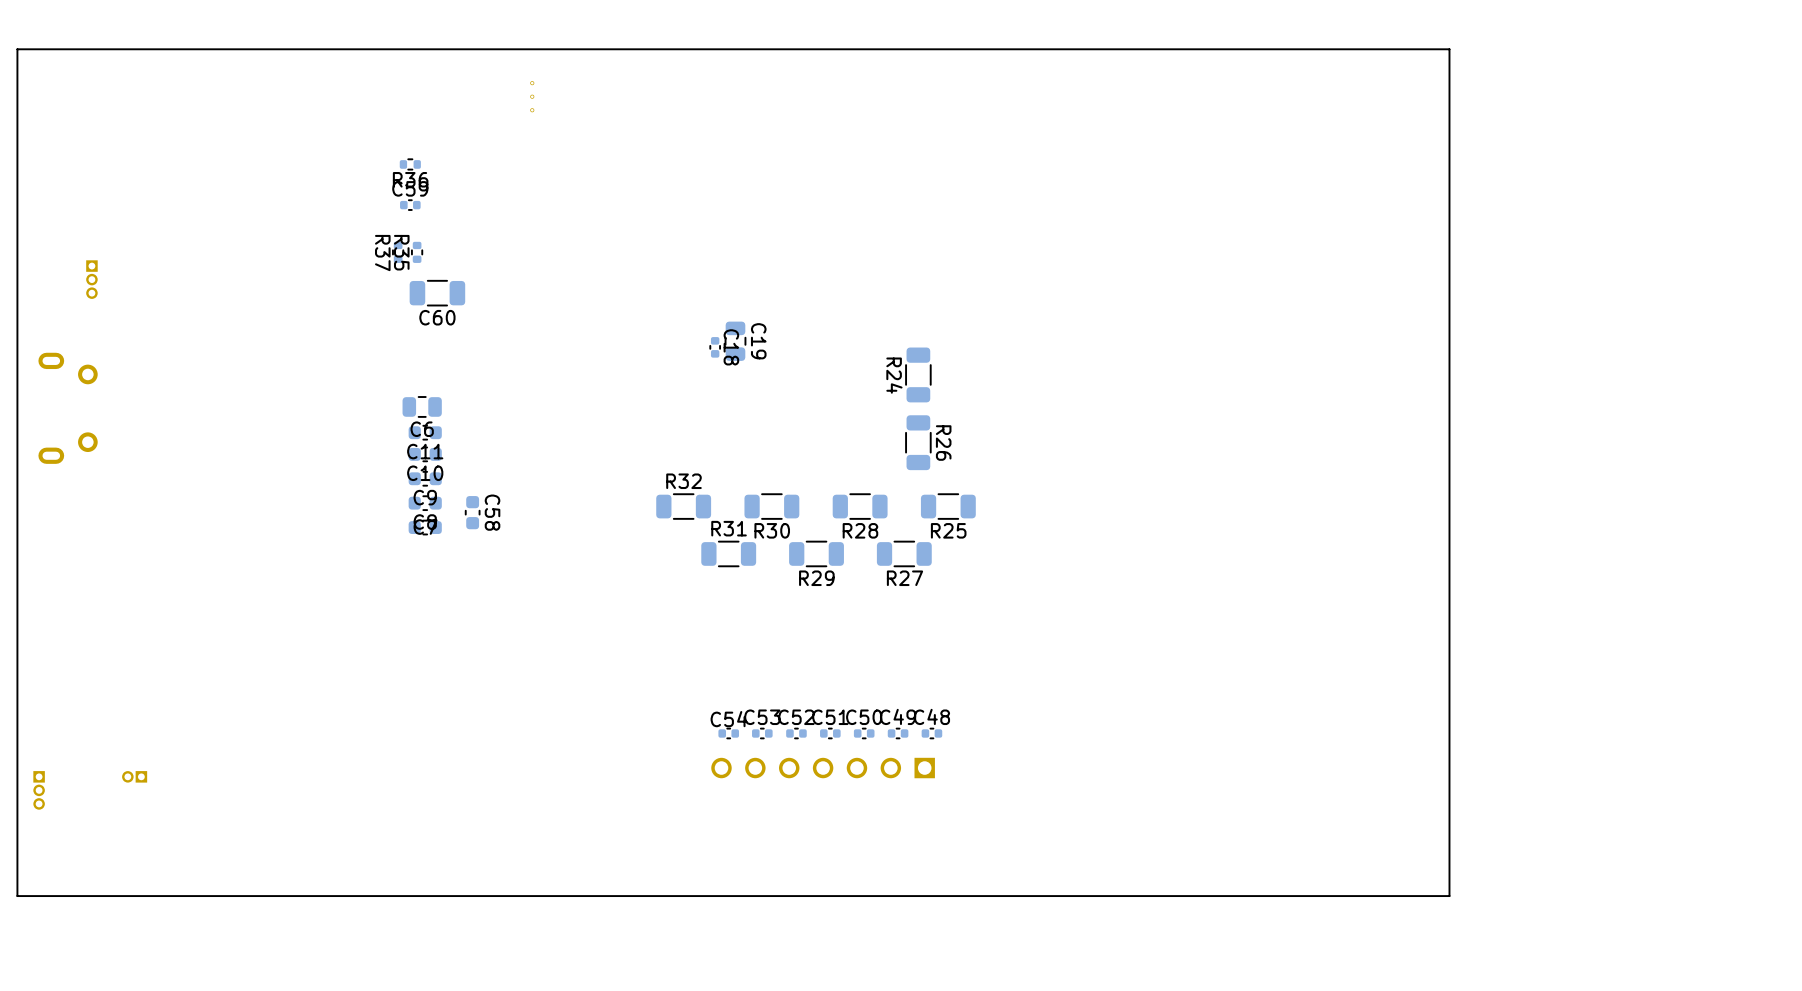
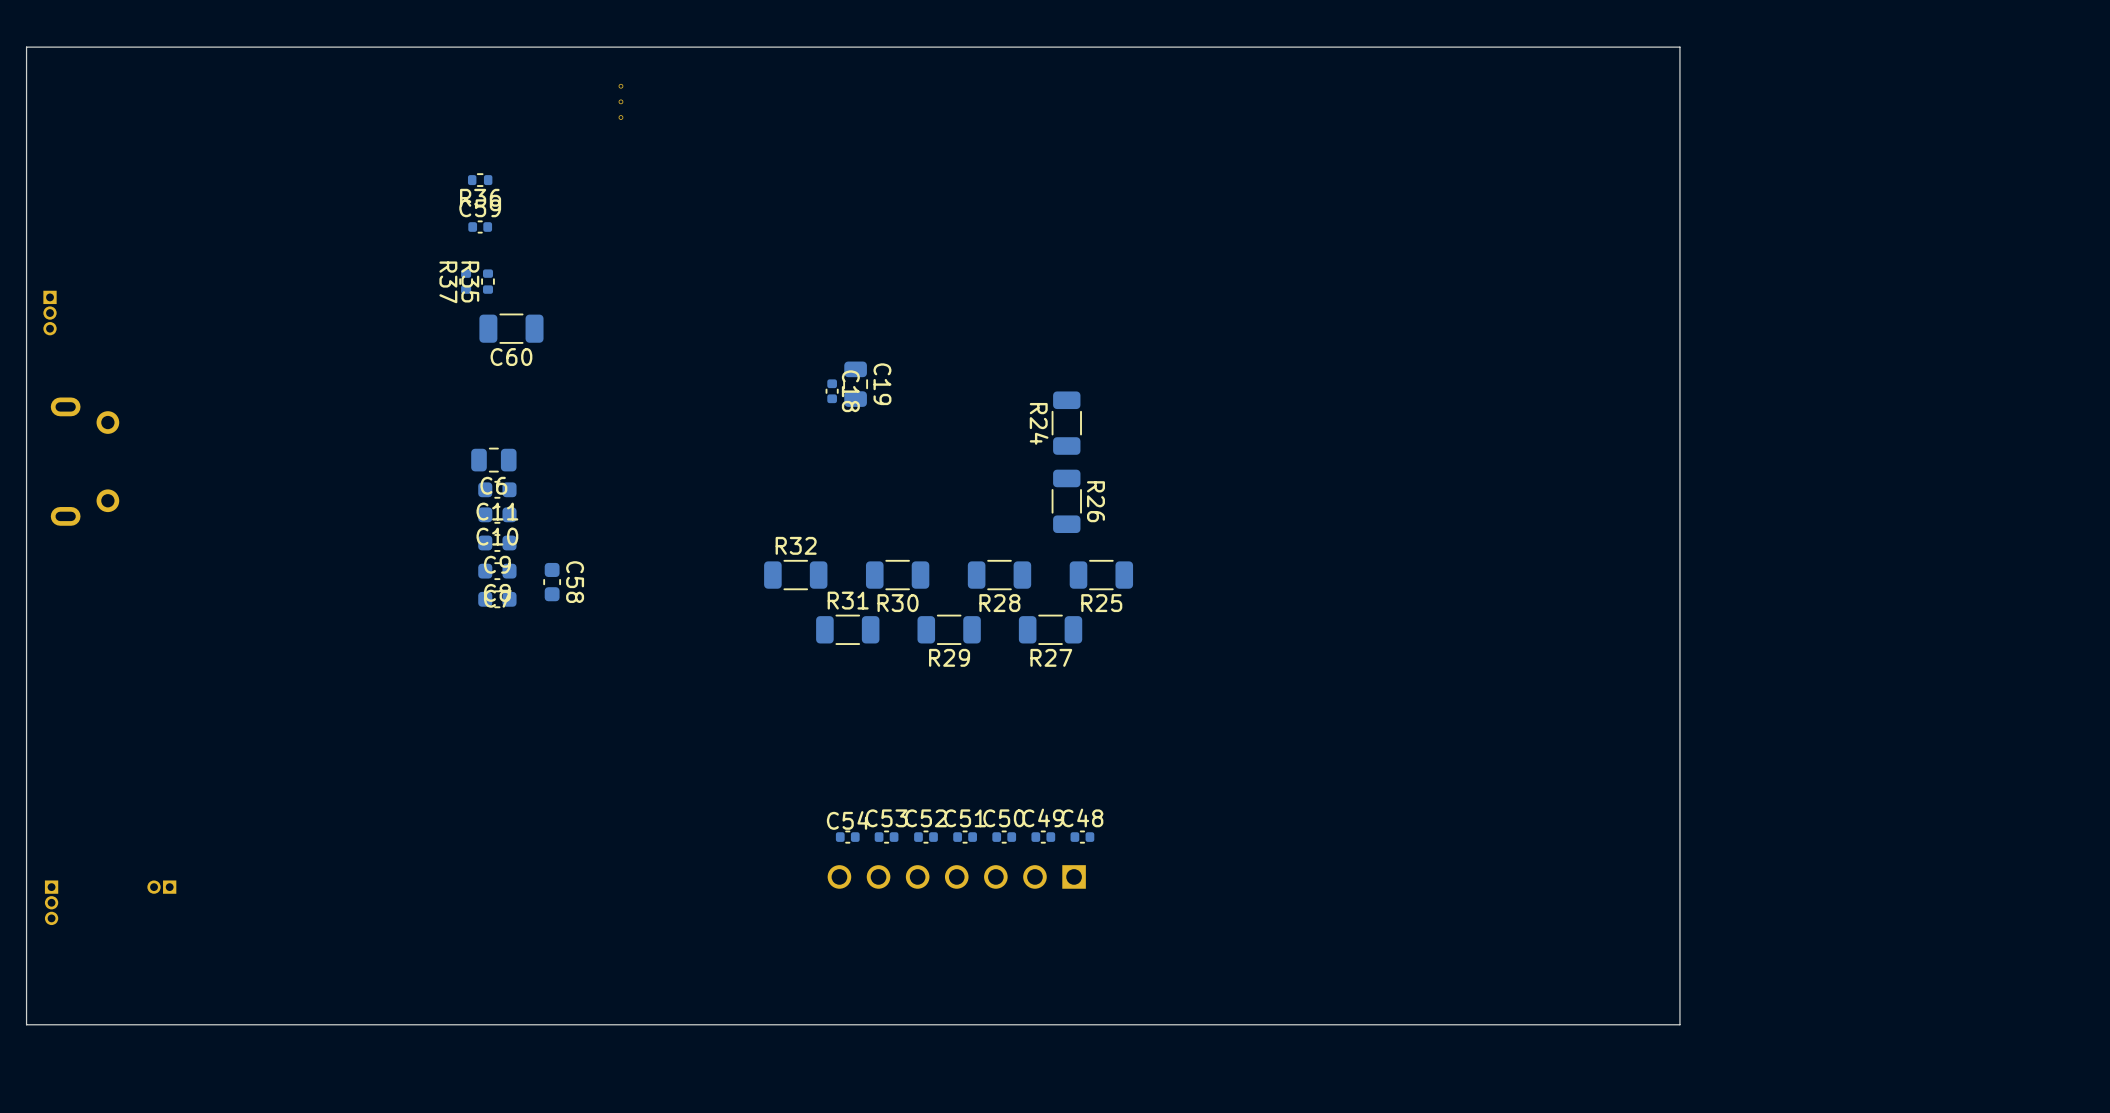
part position: (91, 279) -> (50, 313)

